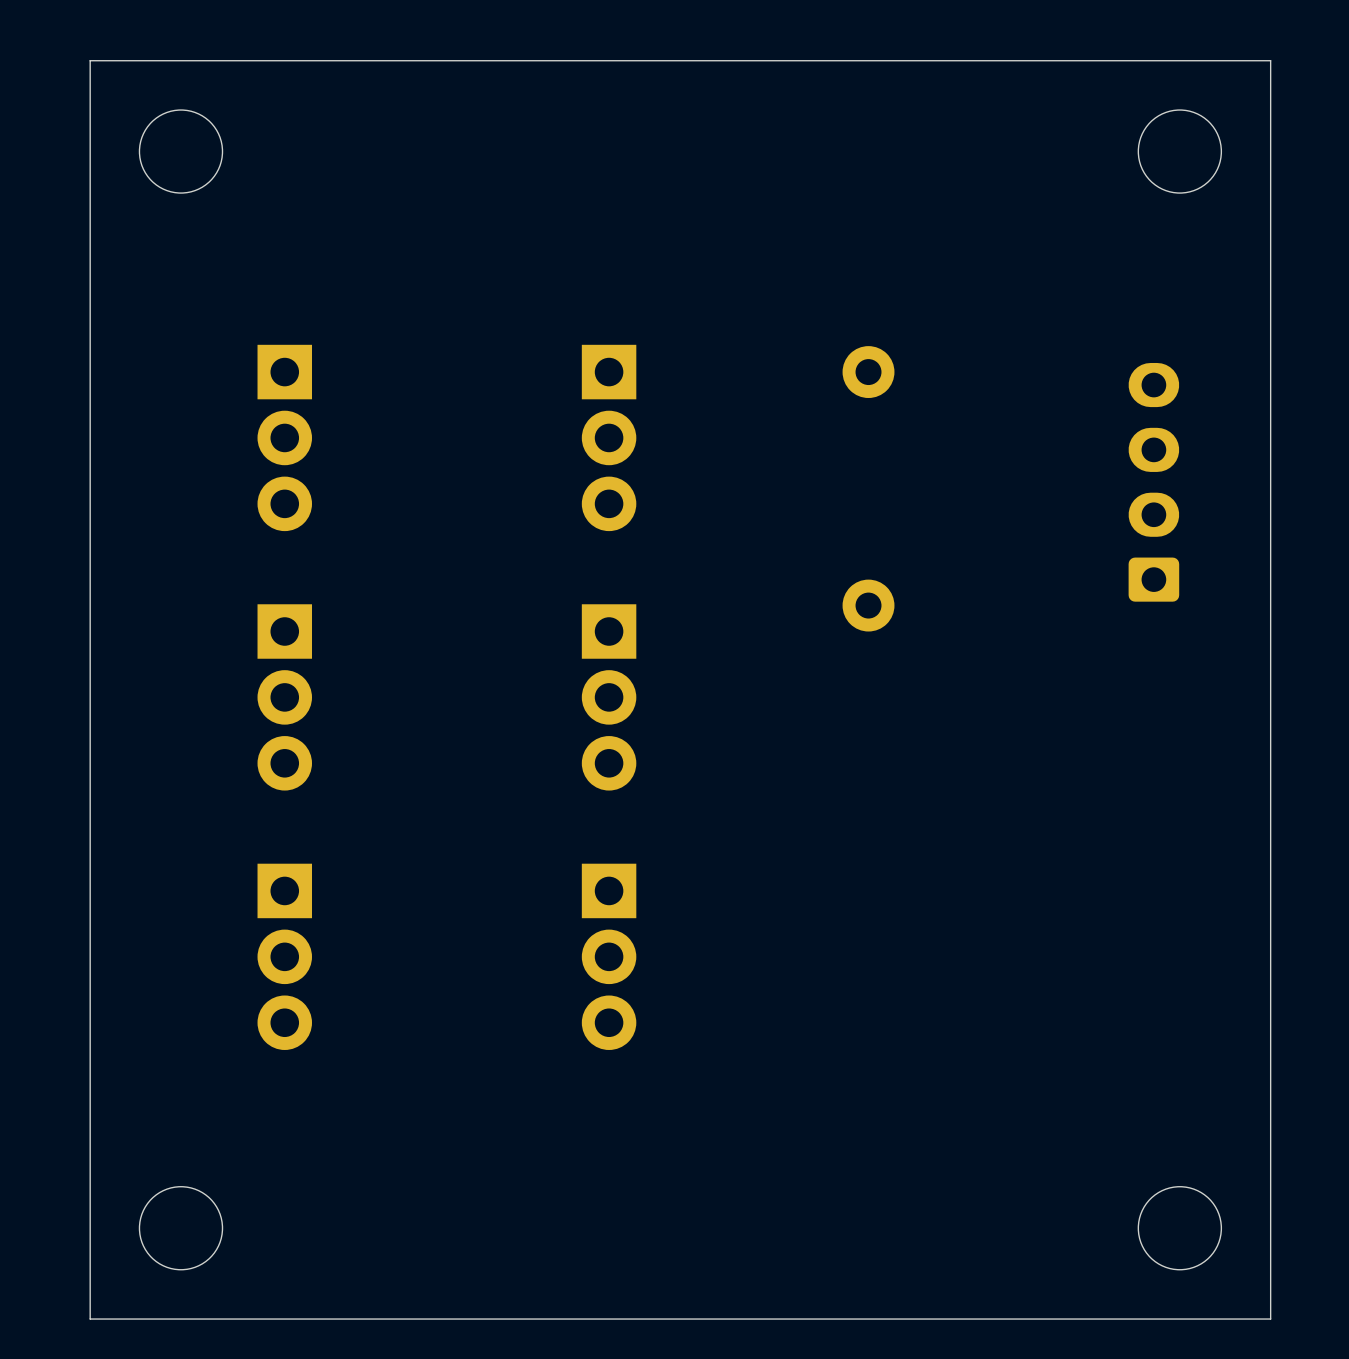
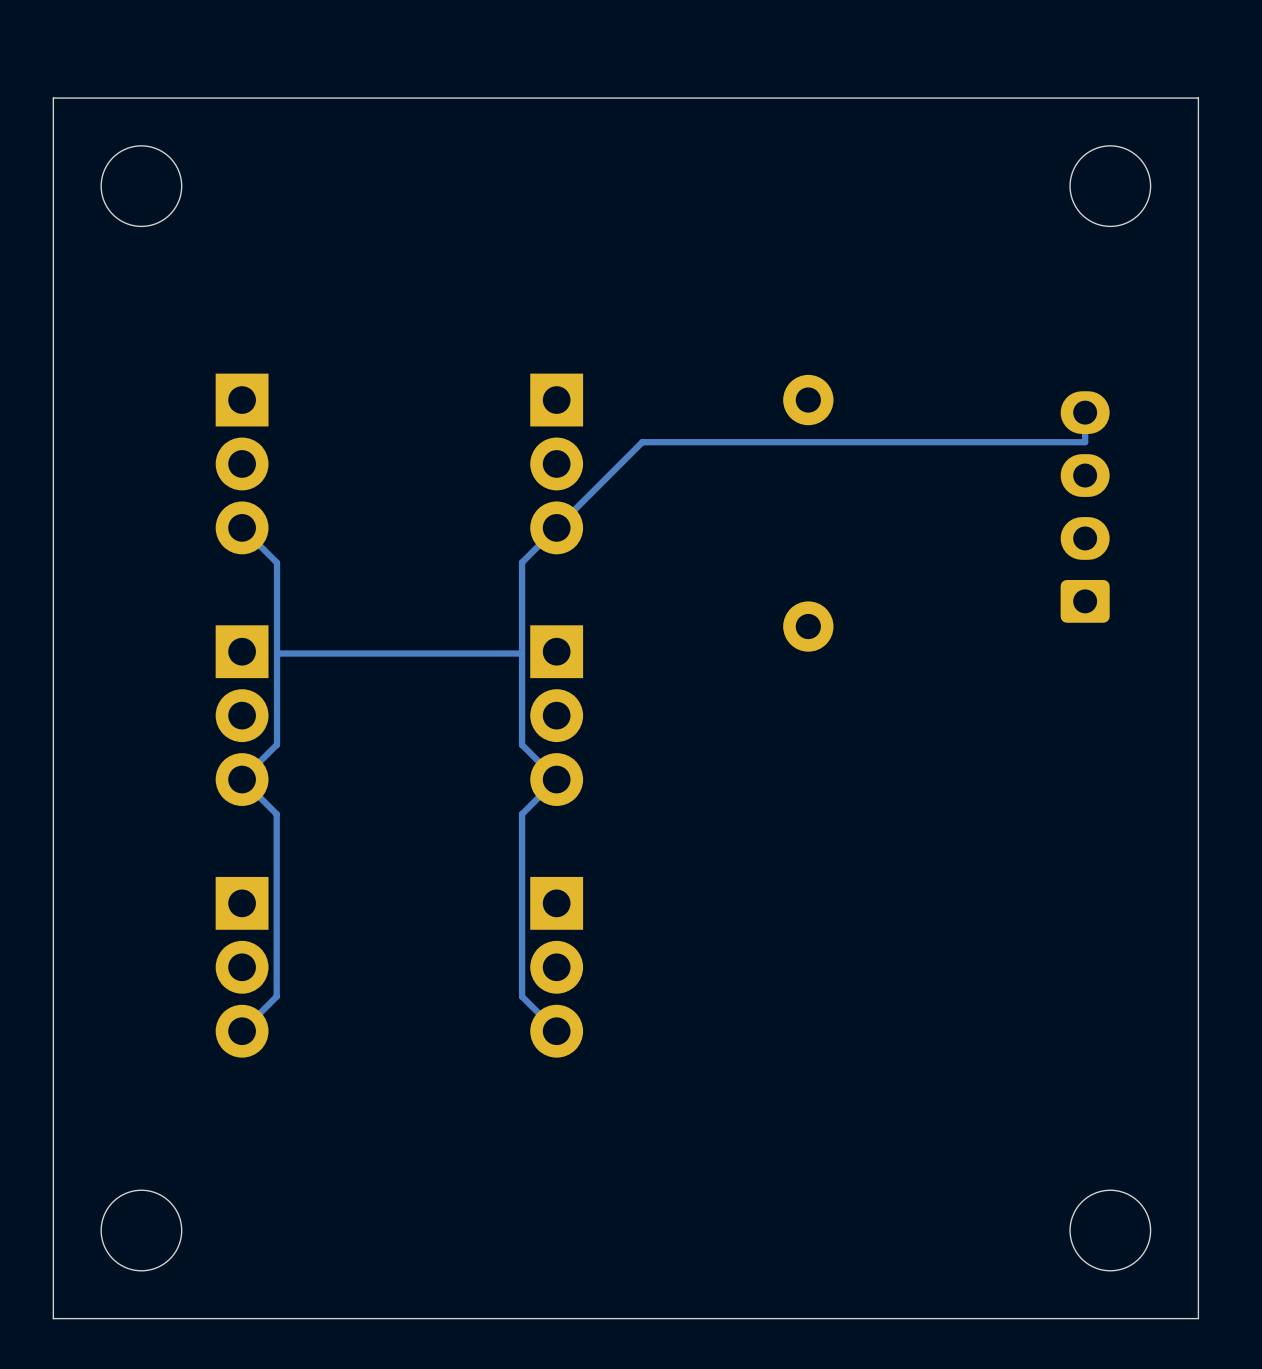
track: none -> (1085, 412) (1085, 442) (642, 442) (522, 562) (522, 744) (556, 779) (522, 814) (522, 996) (556, 1031)
track: none -> (242, 527) (277, 562) (277, 744) (242, 779) (276, 814) (276, 996) (242, 1031)
track: none -> (522, 653) (277, 653)

